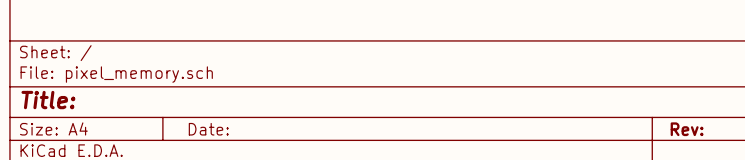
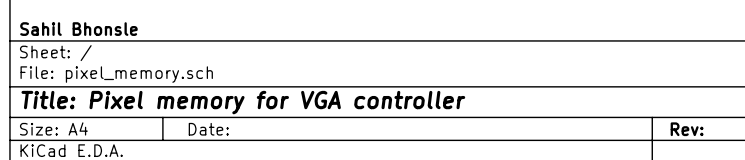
title block: none -> Sahil Bhonsle (78, 29)
title block: Title: (48, 100) -> Title: Pixel memory for VGA controller (243, 102)

